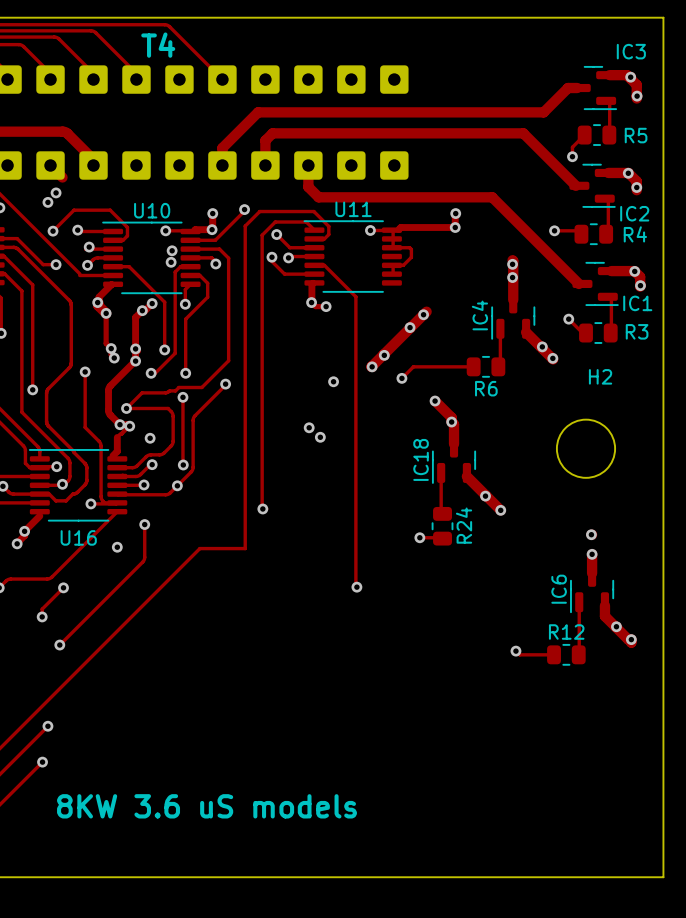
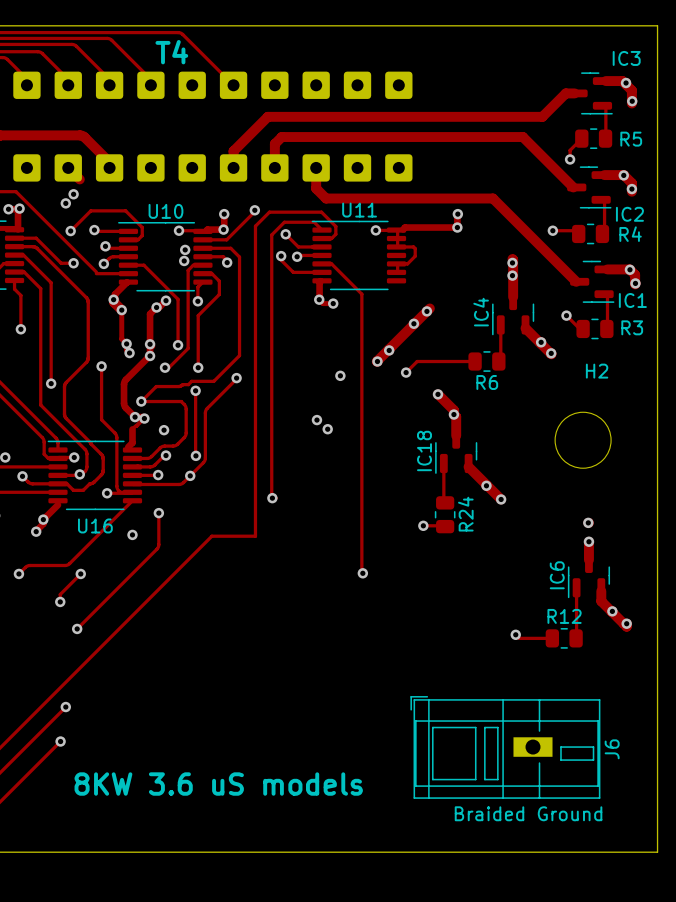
J6: none -> (505, 747)
text: none -> Braided Ground (528, 813)

